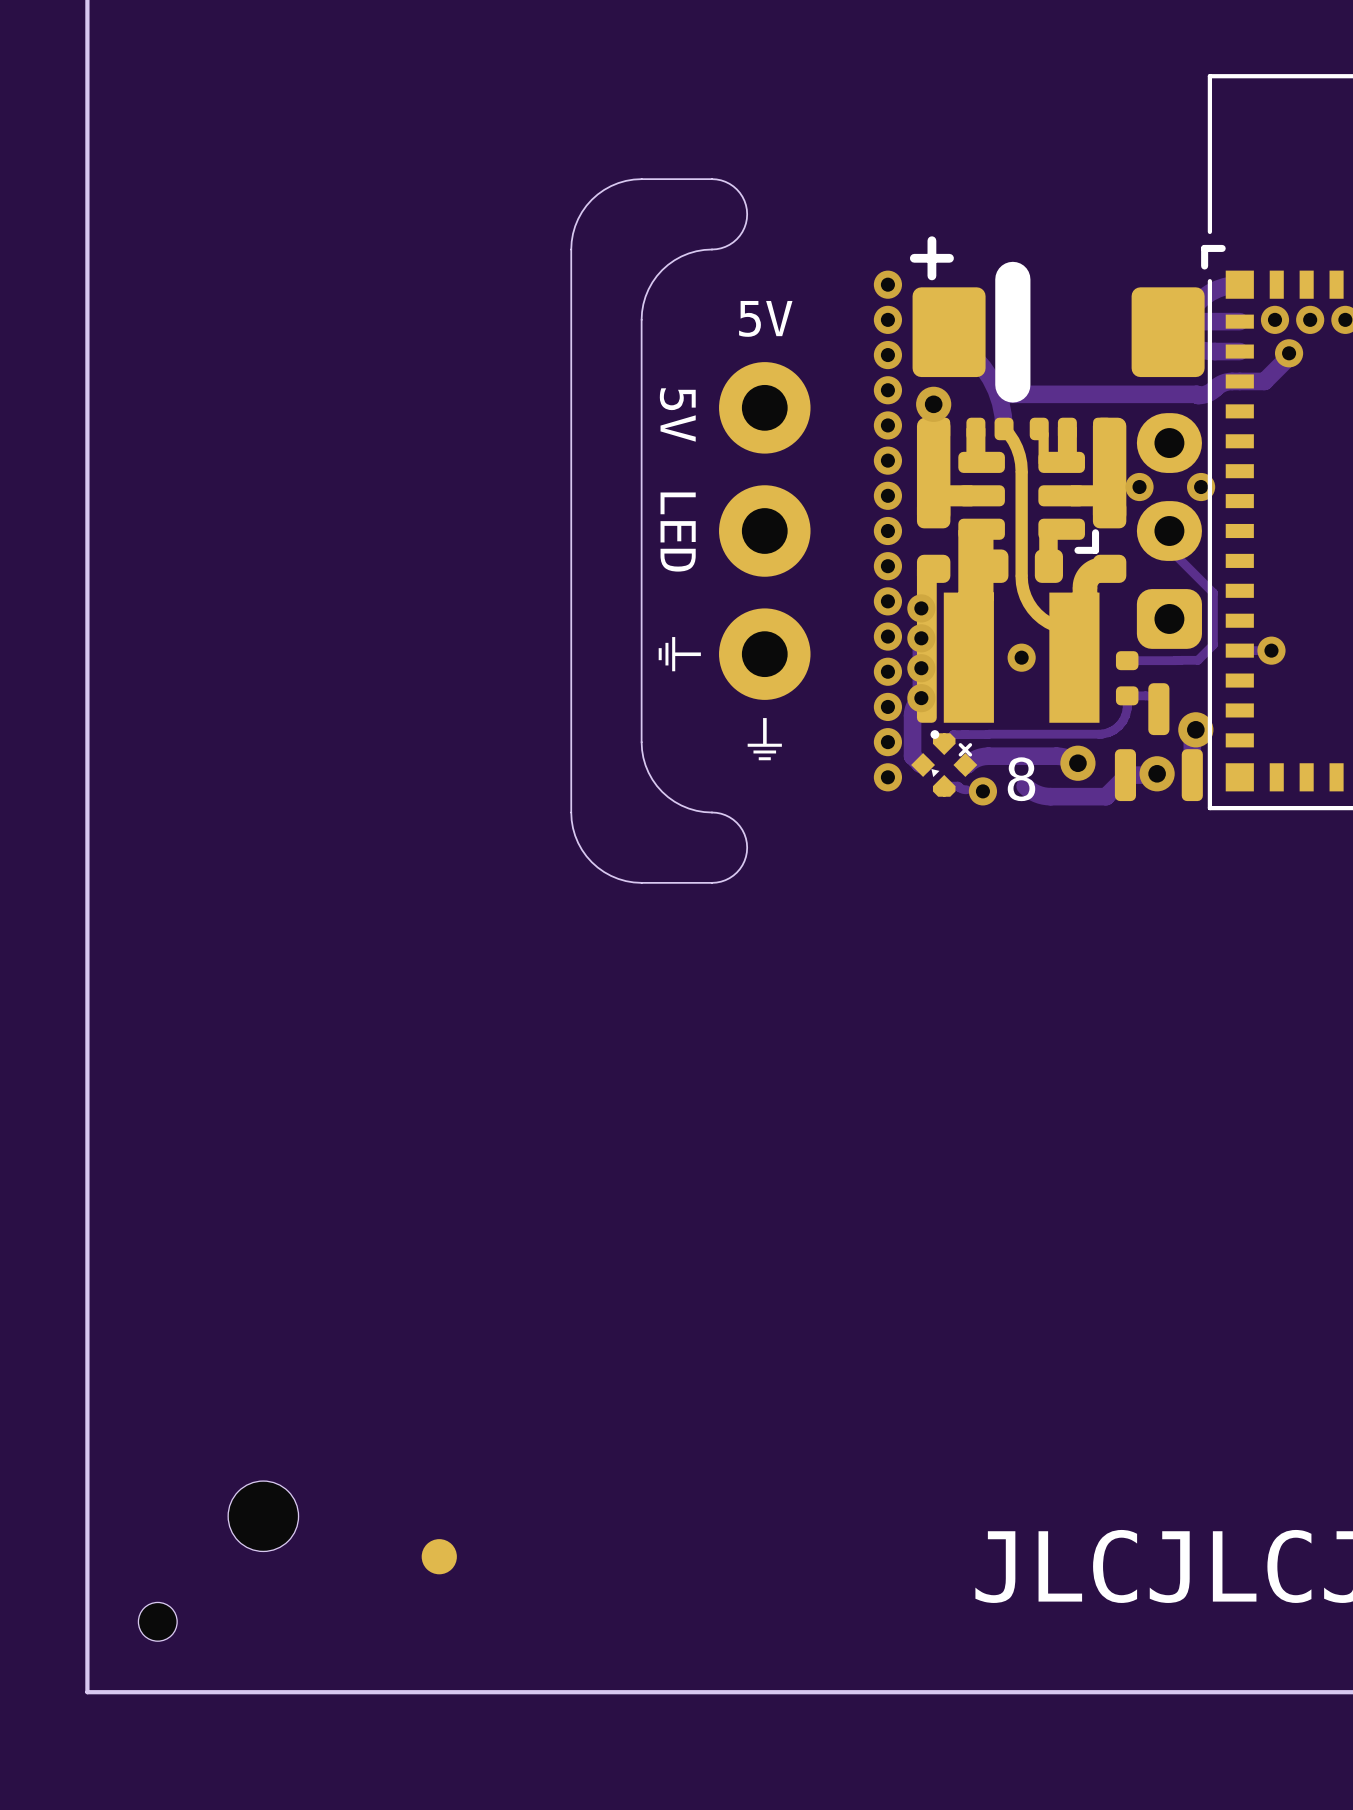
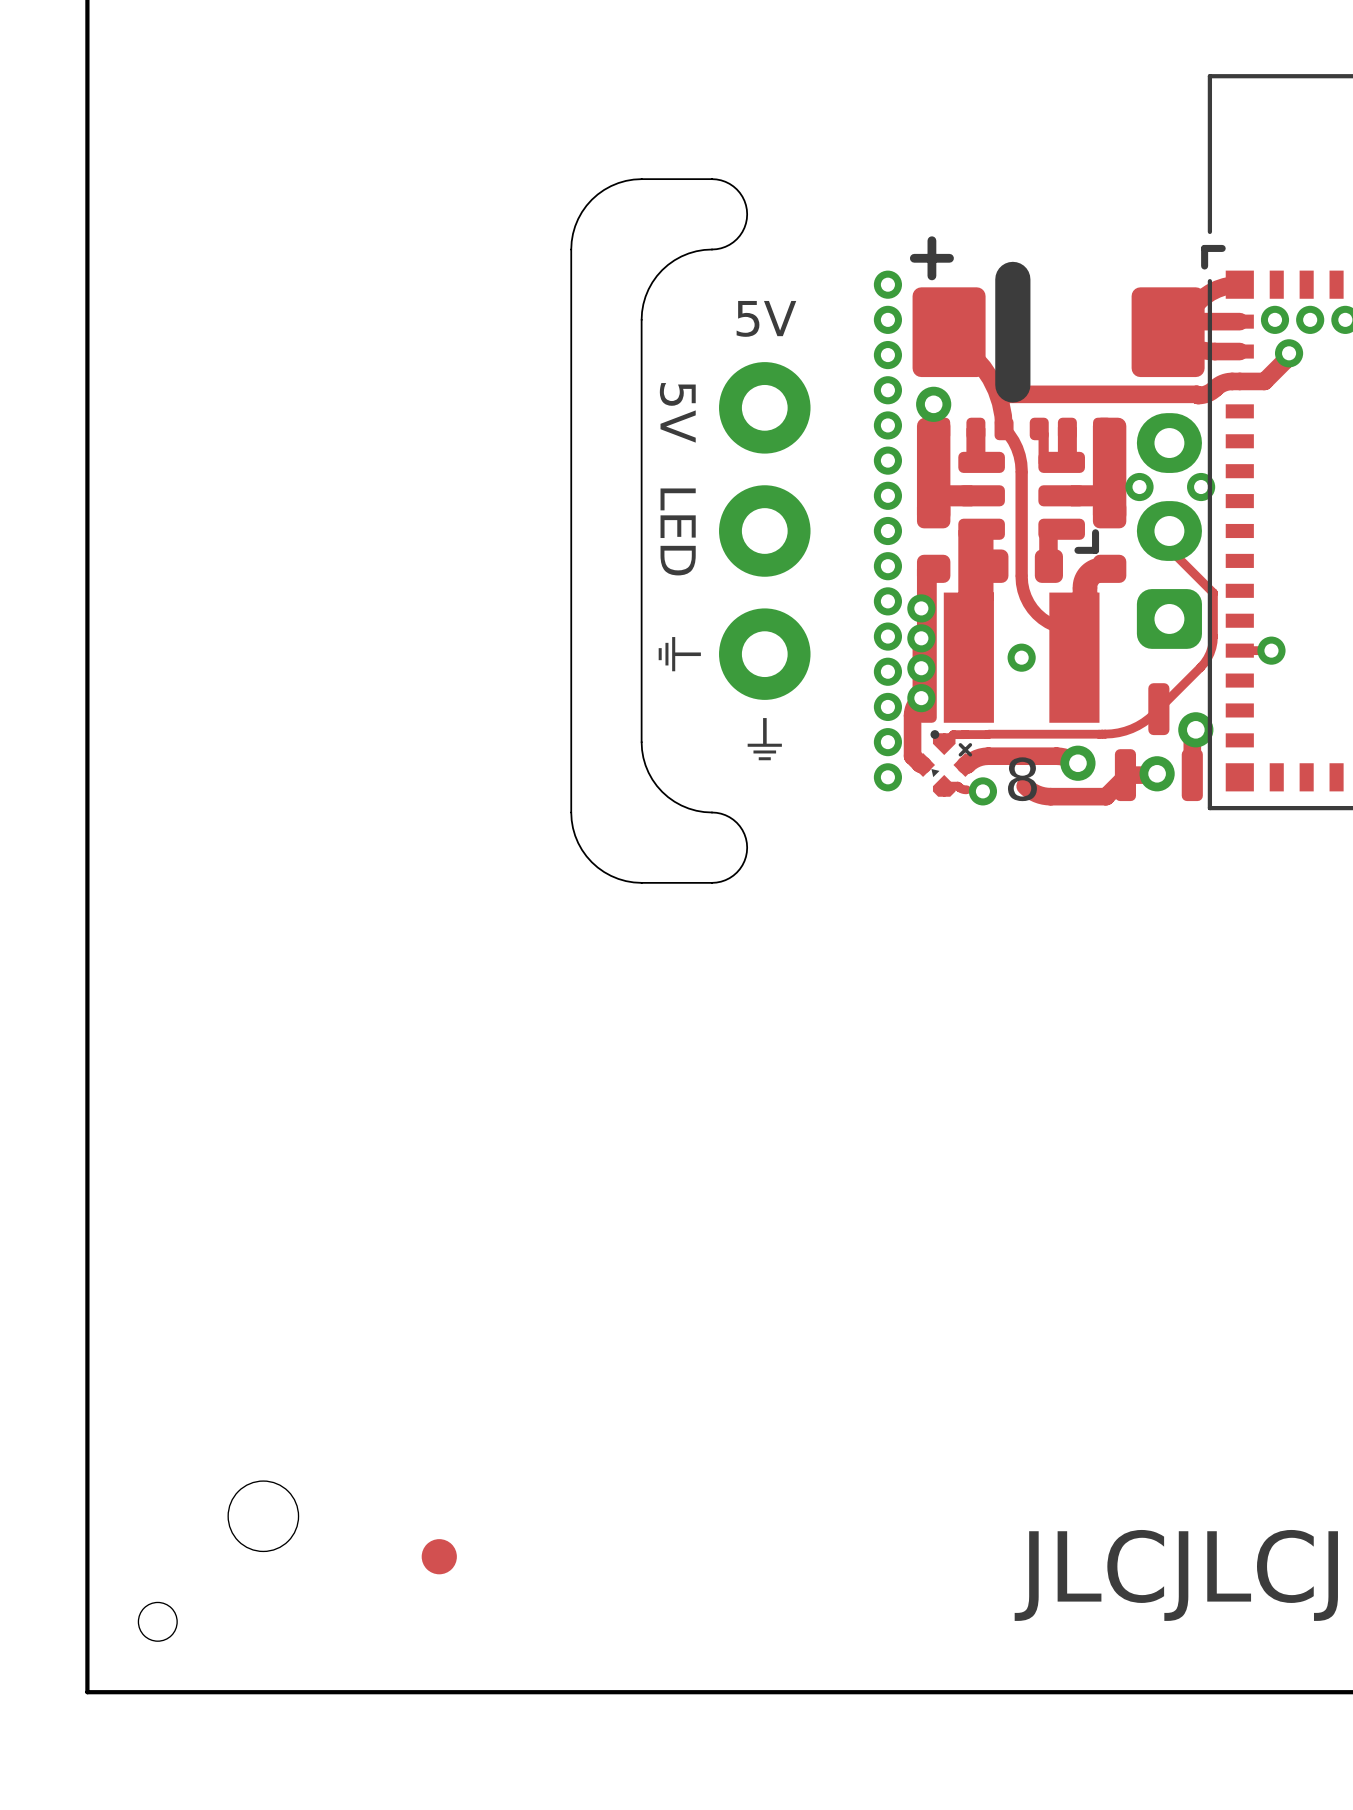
track: (1213, 636) (1213, 644) (1197, 660) (1127, 660) -> (1213, 636) (1210, 653) (1204, 663) (1149, 718) (1125, 731) (1102, 734)
part: (1127, 678) -> none
track: (1158, 709) (1156, 702) (1151, 697) (1127, 695) (1127, 709) (1122, 721) (1114, 729) (1102, 734) -> none

